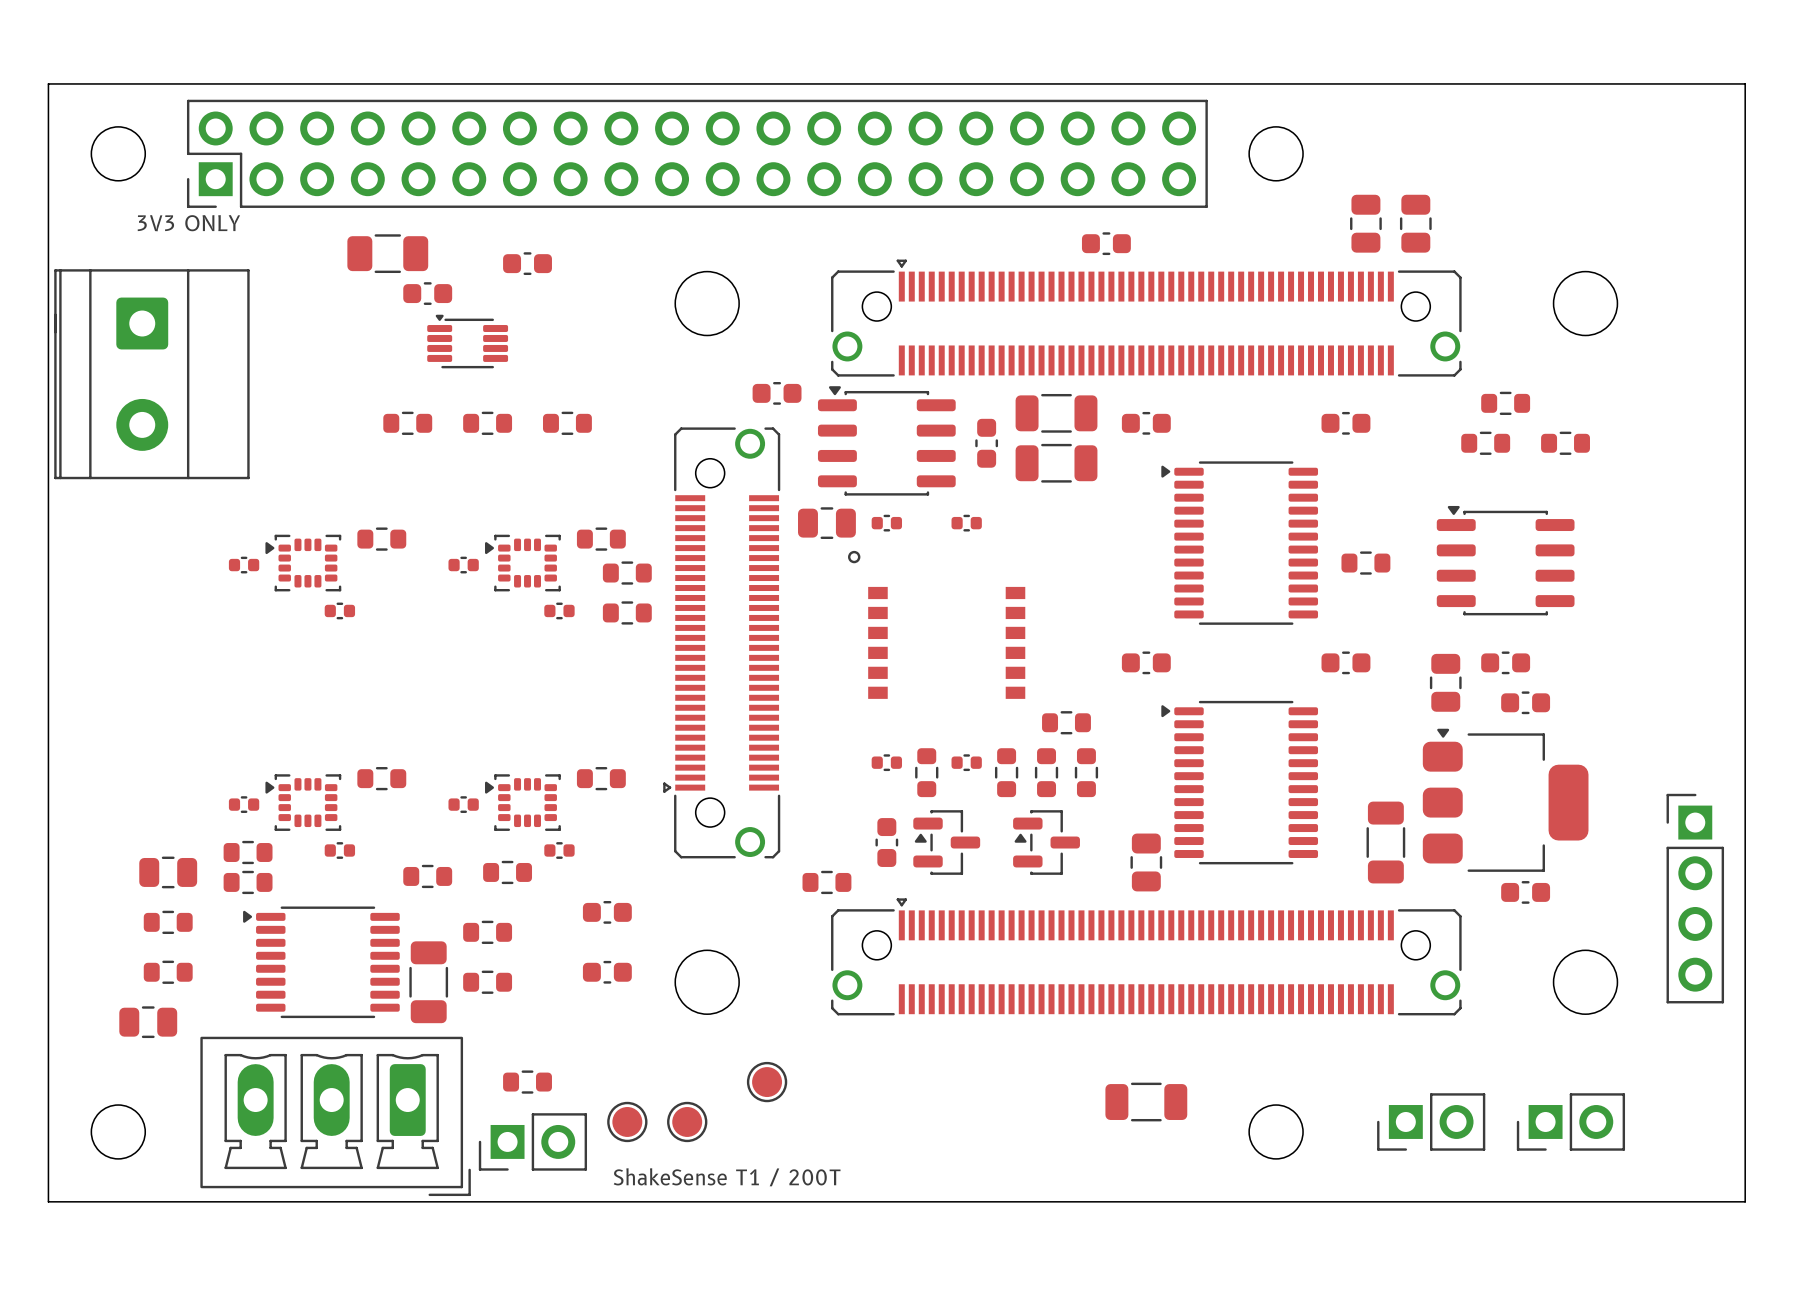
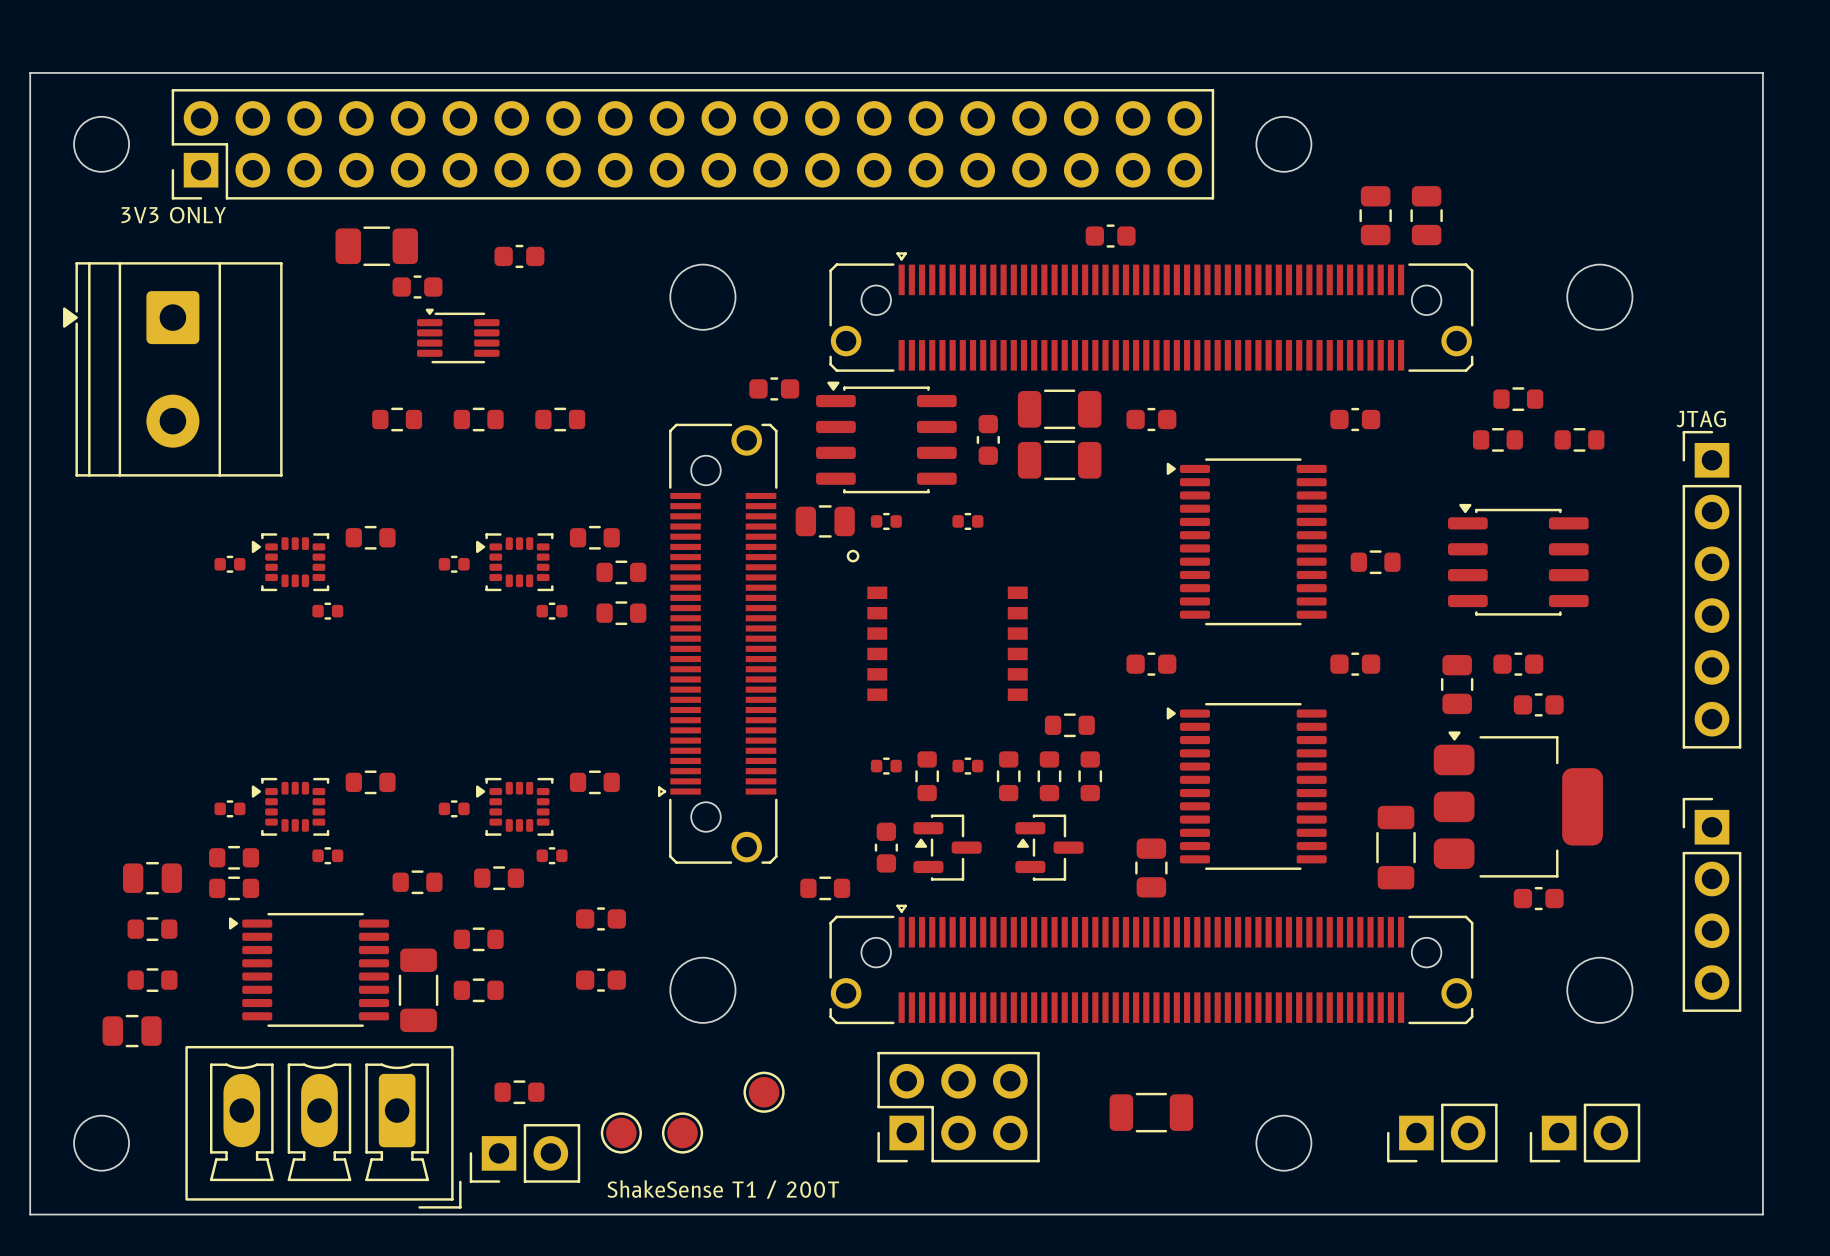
part: (151, 374) -> none
part: none -> (172, 369)
text: none -> JTAG (1701, 419)
part: none -> (1711, 589)
part: none -> (958, 1107)

